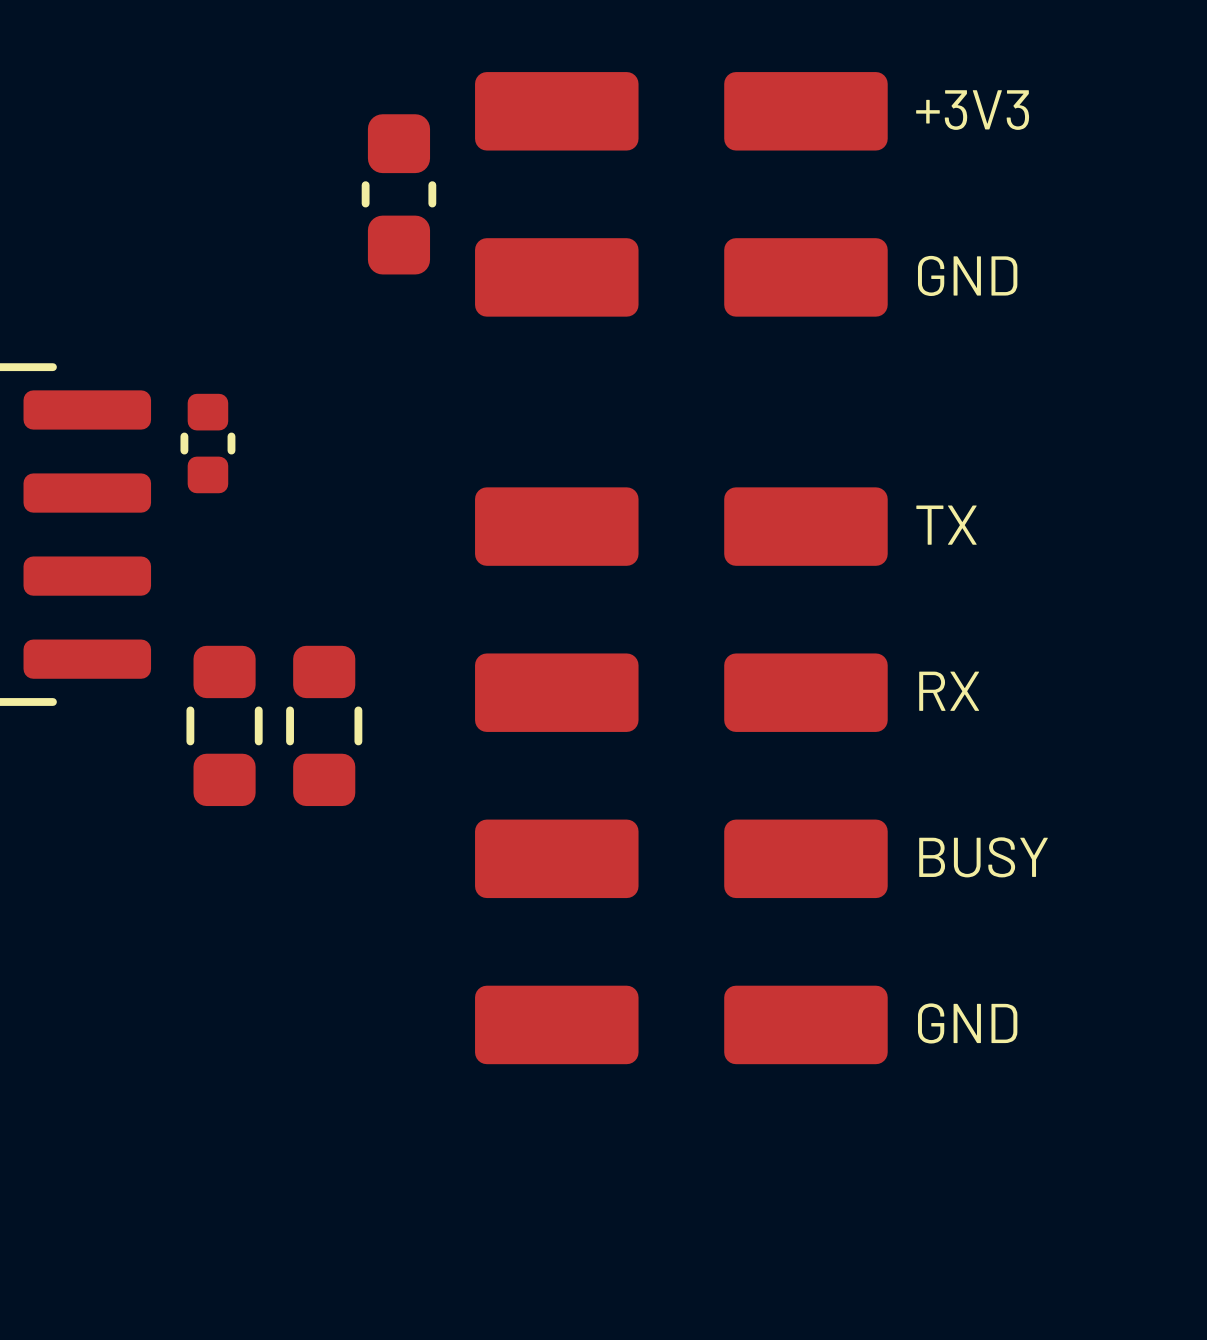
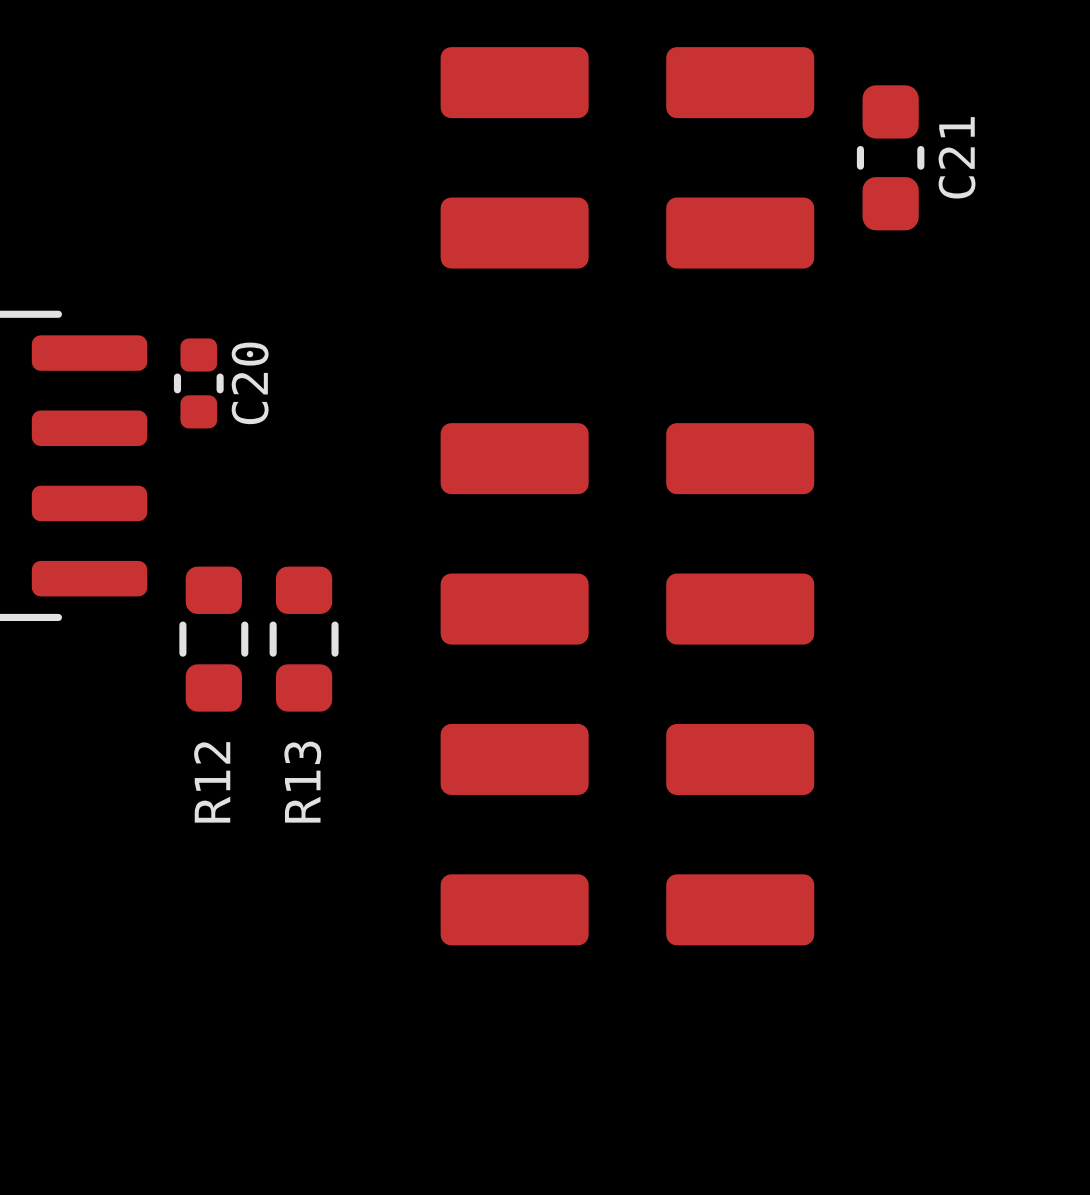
text: +3V3 (972, 110) -> none
part: (398, 194) -> none
C21: none -> (890, 157)
text: GND (967, 275) -> none
C20 name: none -> C20 (250, 383)
text: TX (946, 525) -> none
text: RX (949, 691) -> none
text: BUSY (983, 857) -> none
R12 name: none -> R12 (212, 782)
R13 name: none -> R13 (302, 782)
text: GND (967, 1023) -> none

